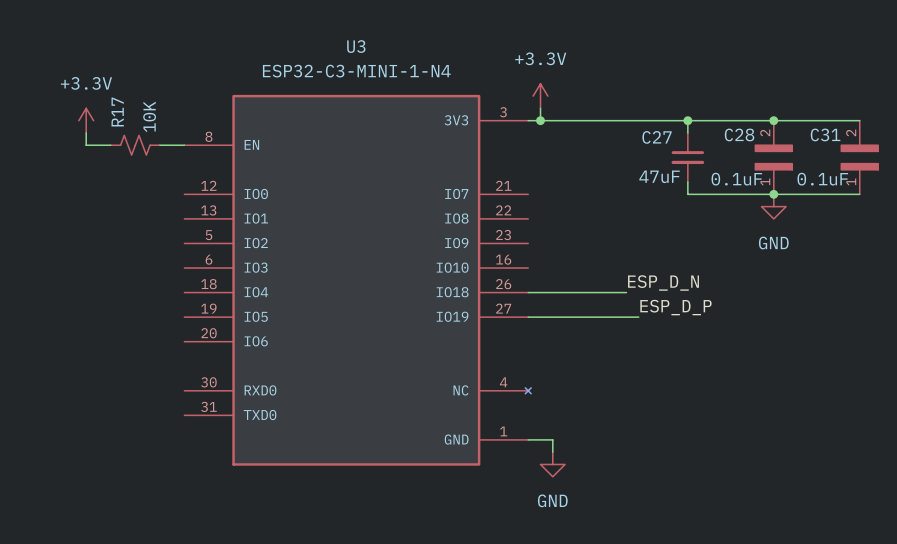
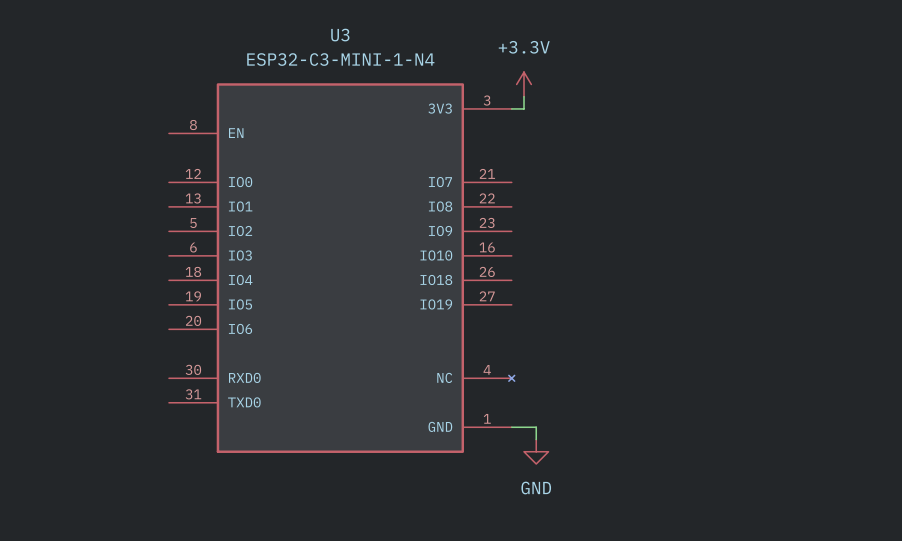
power symbol: +3.3V (86, 120) -> none
wire: (540, 120) (859, 120) -> none
junction: (540, 120) -> none
wire: (687, 120) (687, 132) -> none
junction: (687, 120) -> none
junction: (773, 120) -> none
wire: (86, 132) (86, 145) (110, 145) -> none
R17: 10K (135, 145) -> none
wire: (159, 145) (184, 145) -> none
C27: 47uF (687, 157) -> none
C28: 0.1uF (773, 157) -> none
C31: 0.1uF (859, 157) -> none
wire: (687, 182) (687, 194) (859, 194) -> none
junction: (773, 194) -> none
power symbol: GND (773, 206) -> none
label: ESP_D_N (663, 283) -> none
wire: (528, 292) (626, 292) -> none
label: ESP_D_P (675, 307) -> none
wire: (528, 317) (638, 317) -> none

